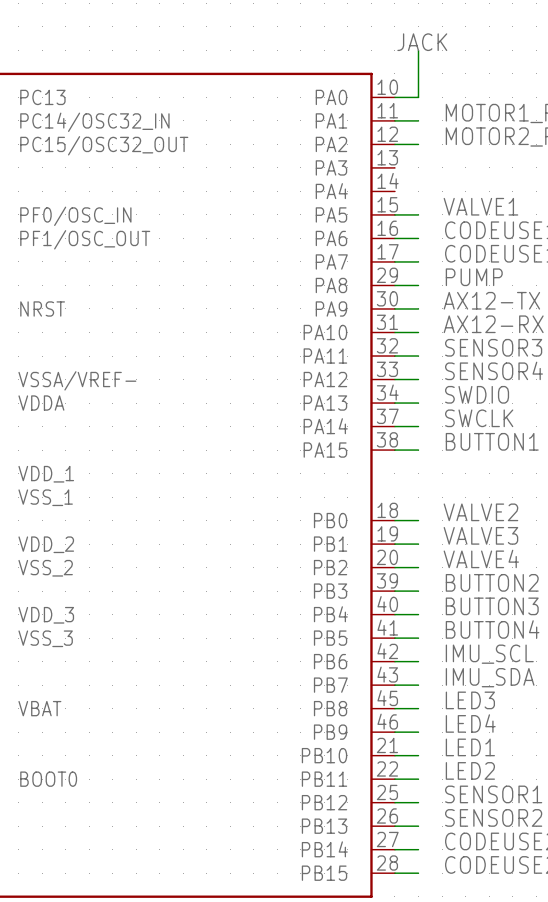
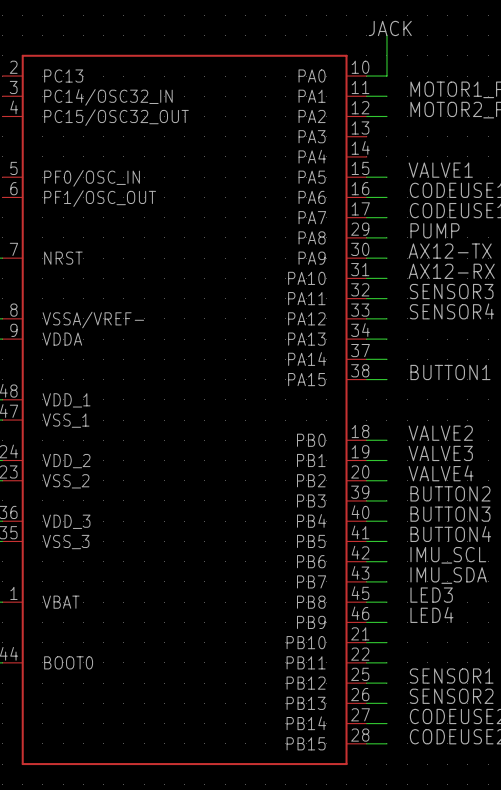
label: SWDIO (477, 394) -> none
label: SWCLK (479, 418) -> none
label: LED1 (470, 747) -> none
label: LED2 (470, 770) -> none

